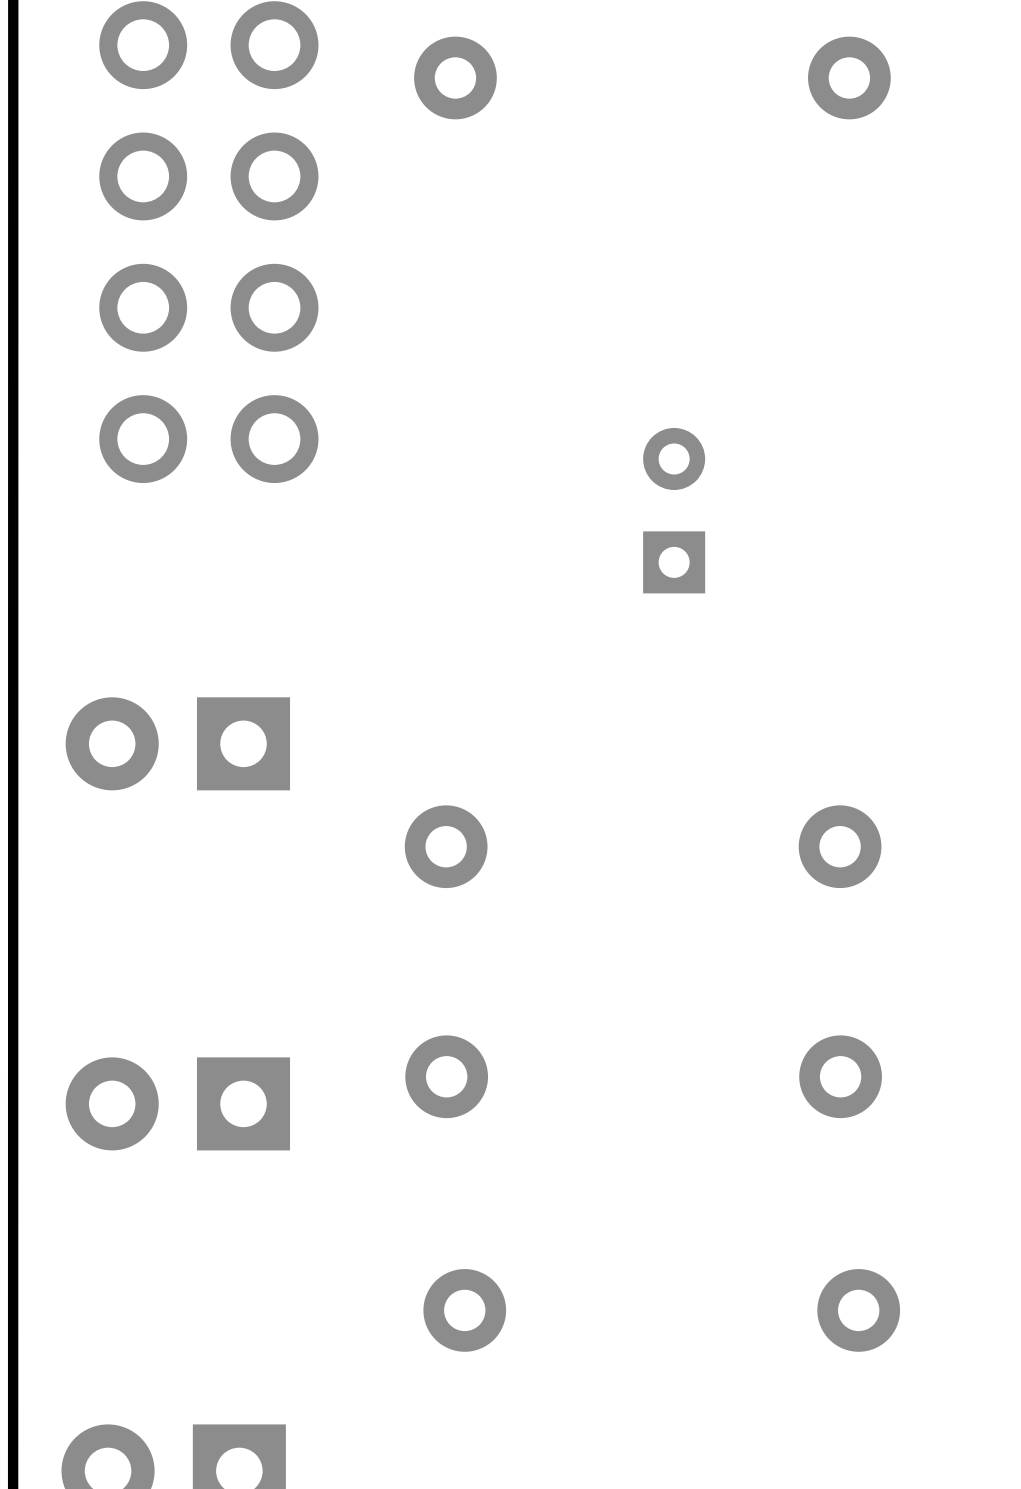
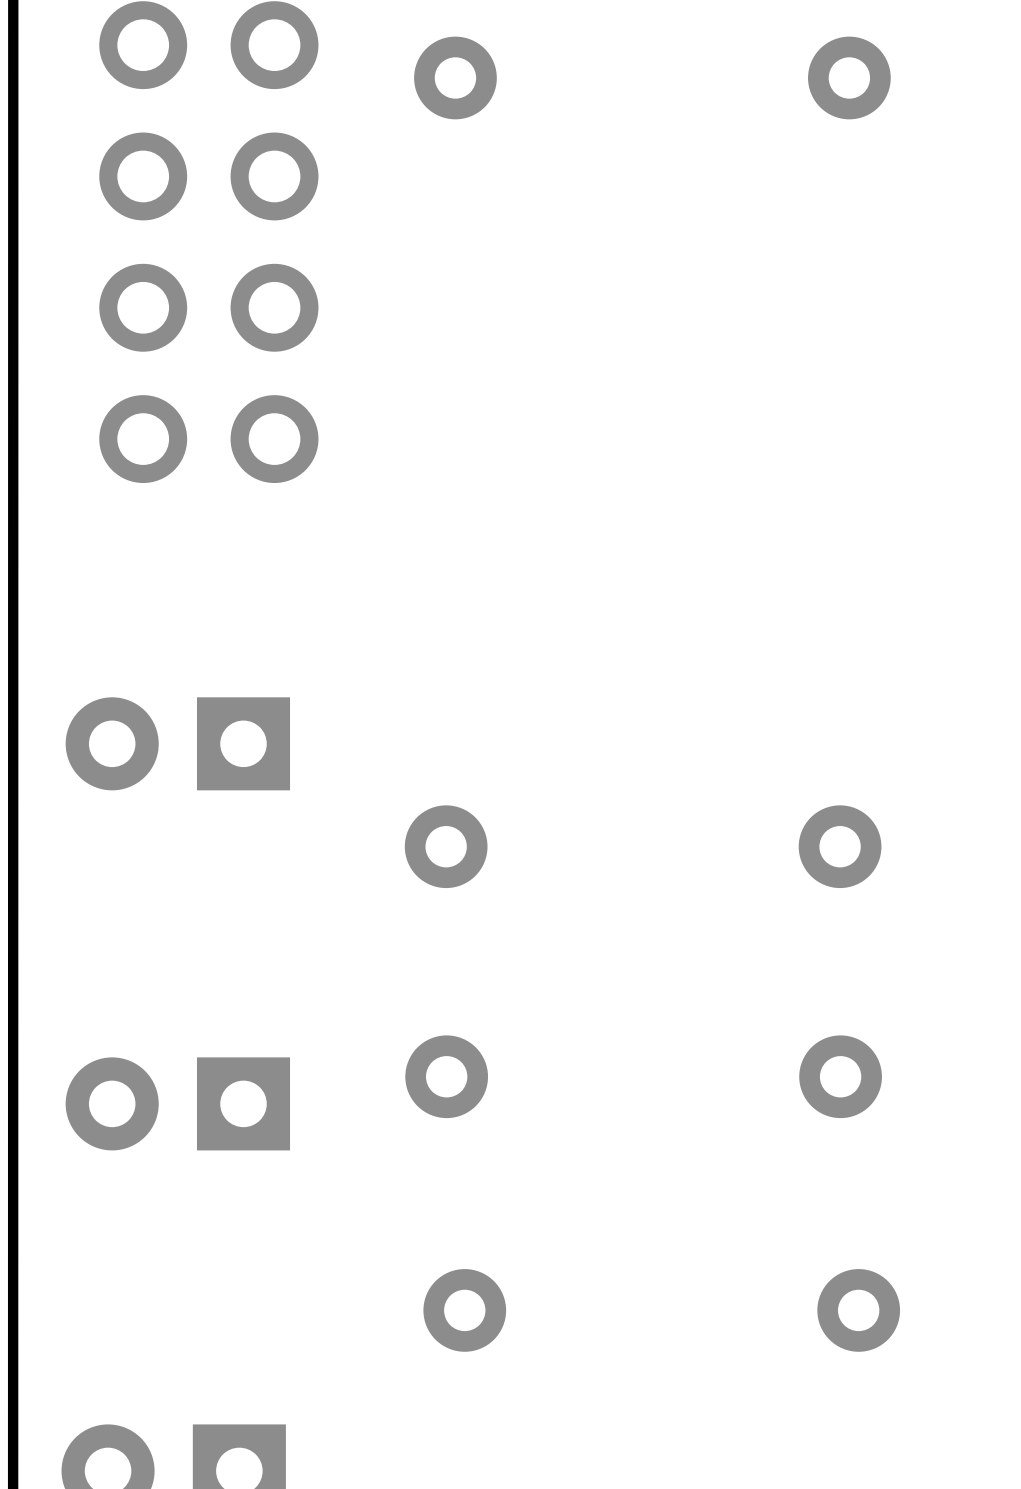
part: (674, 510) -> none

